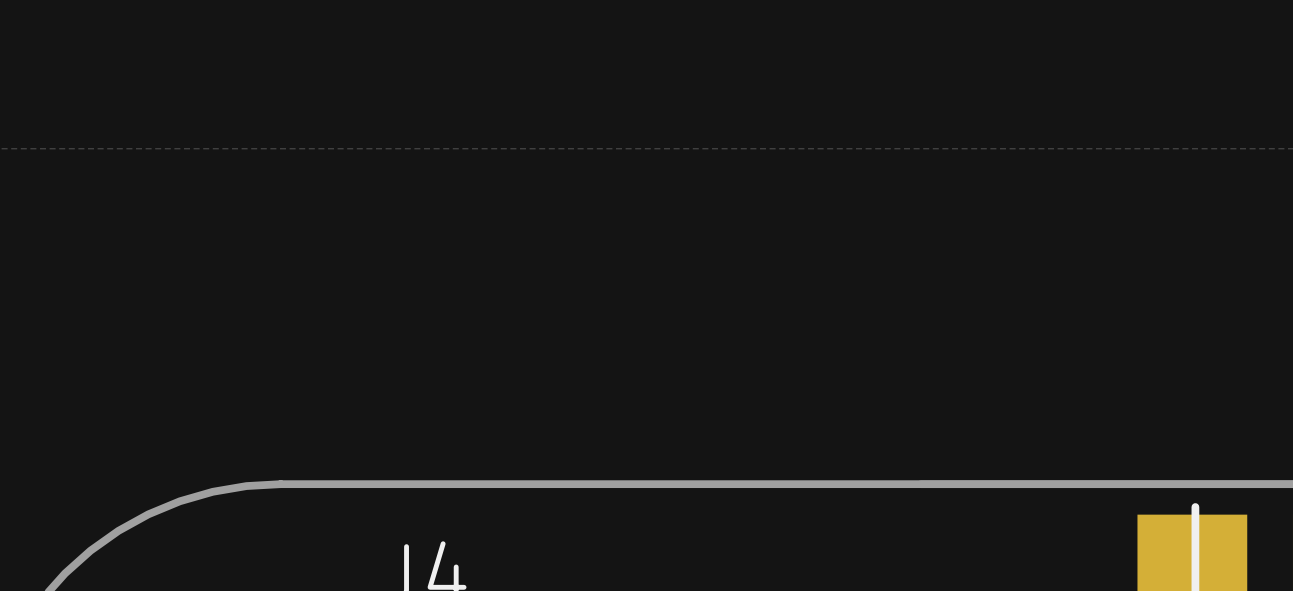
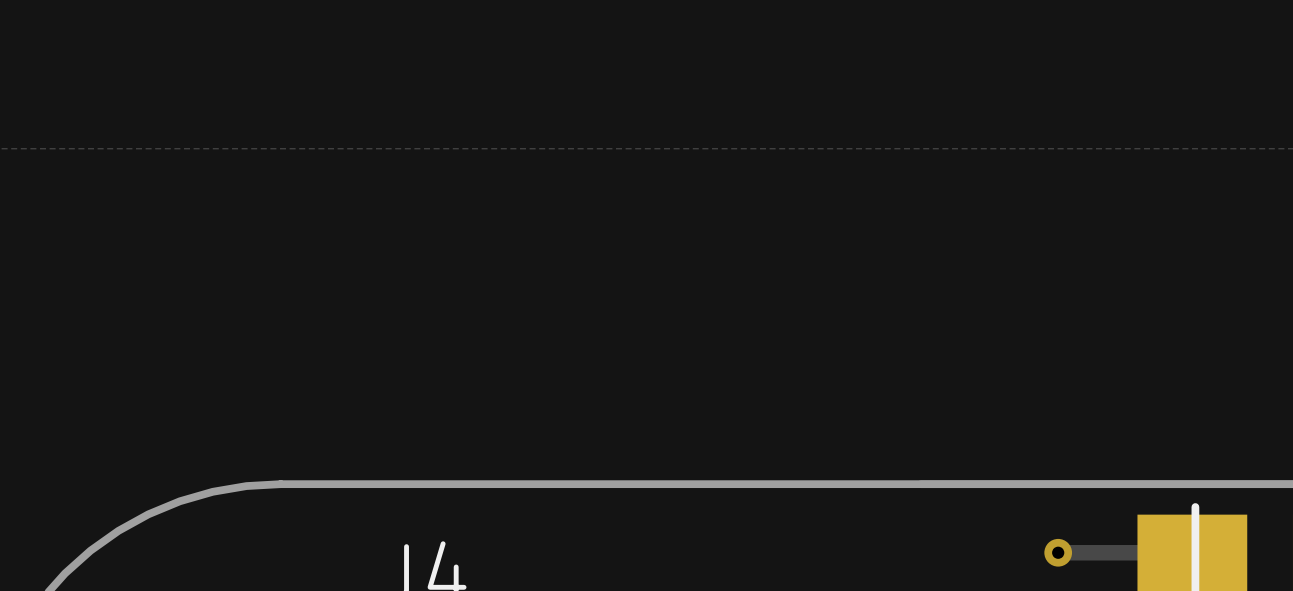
track: none -> (1058, 552) (1172, 552) (1192, 572)
via: none -> (1058, 552)

